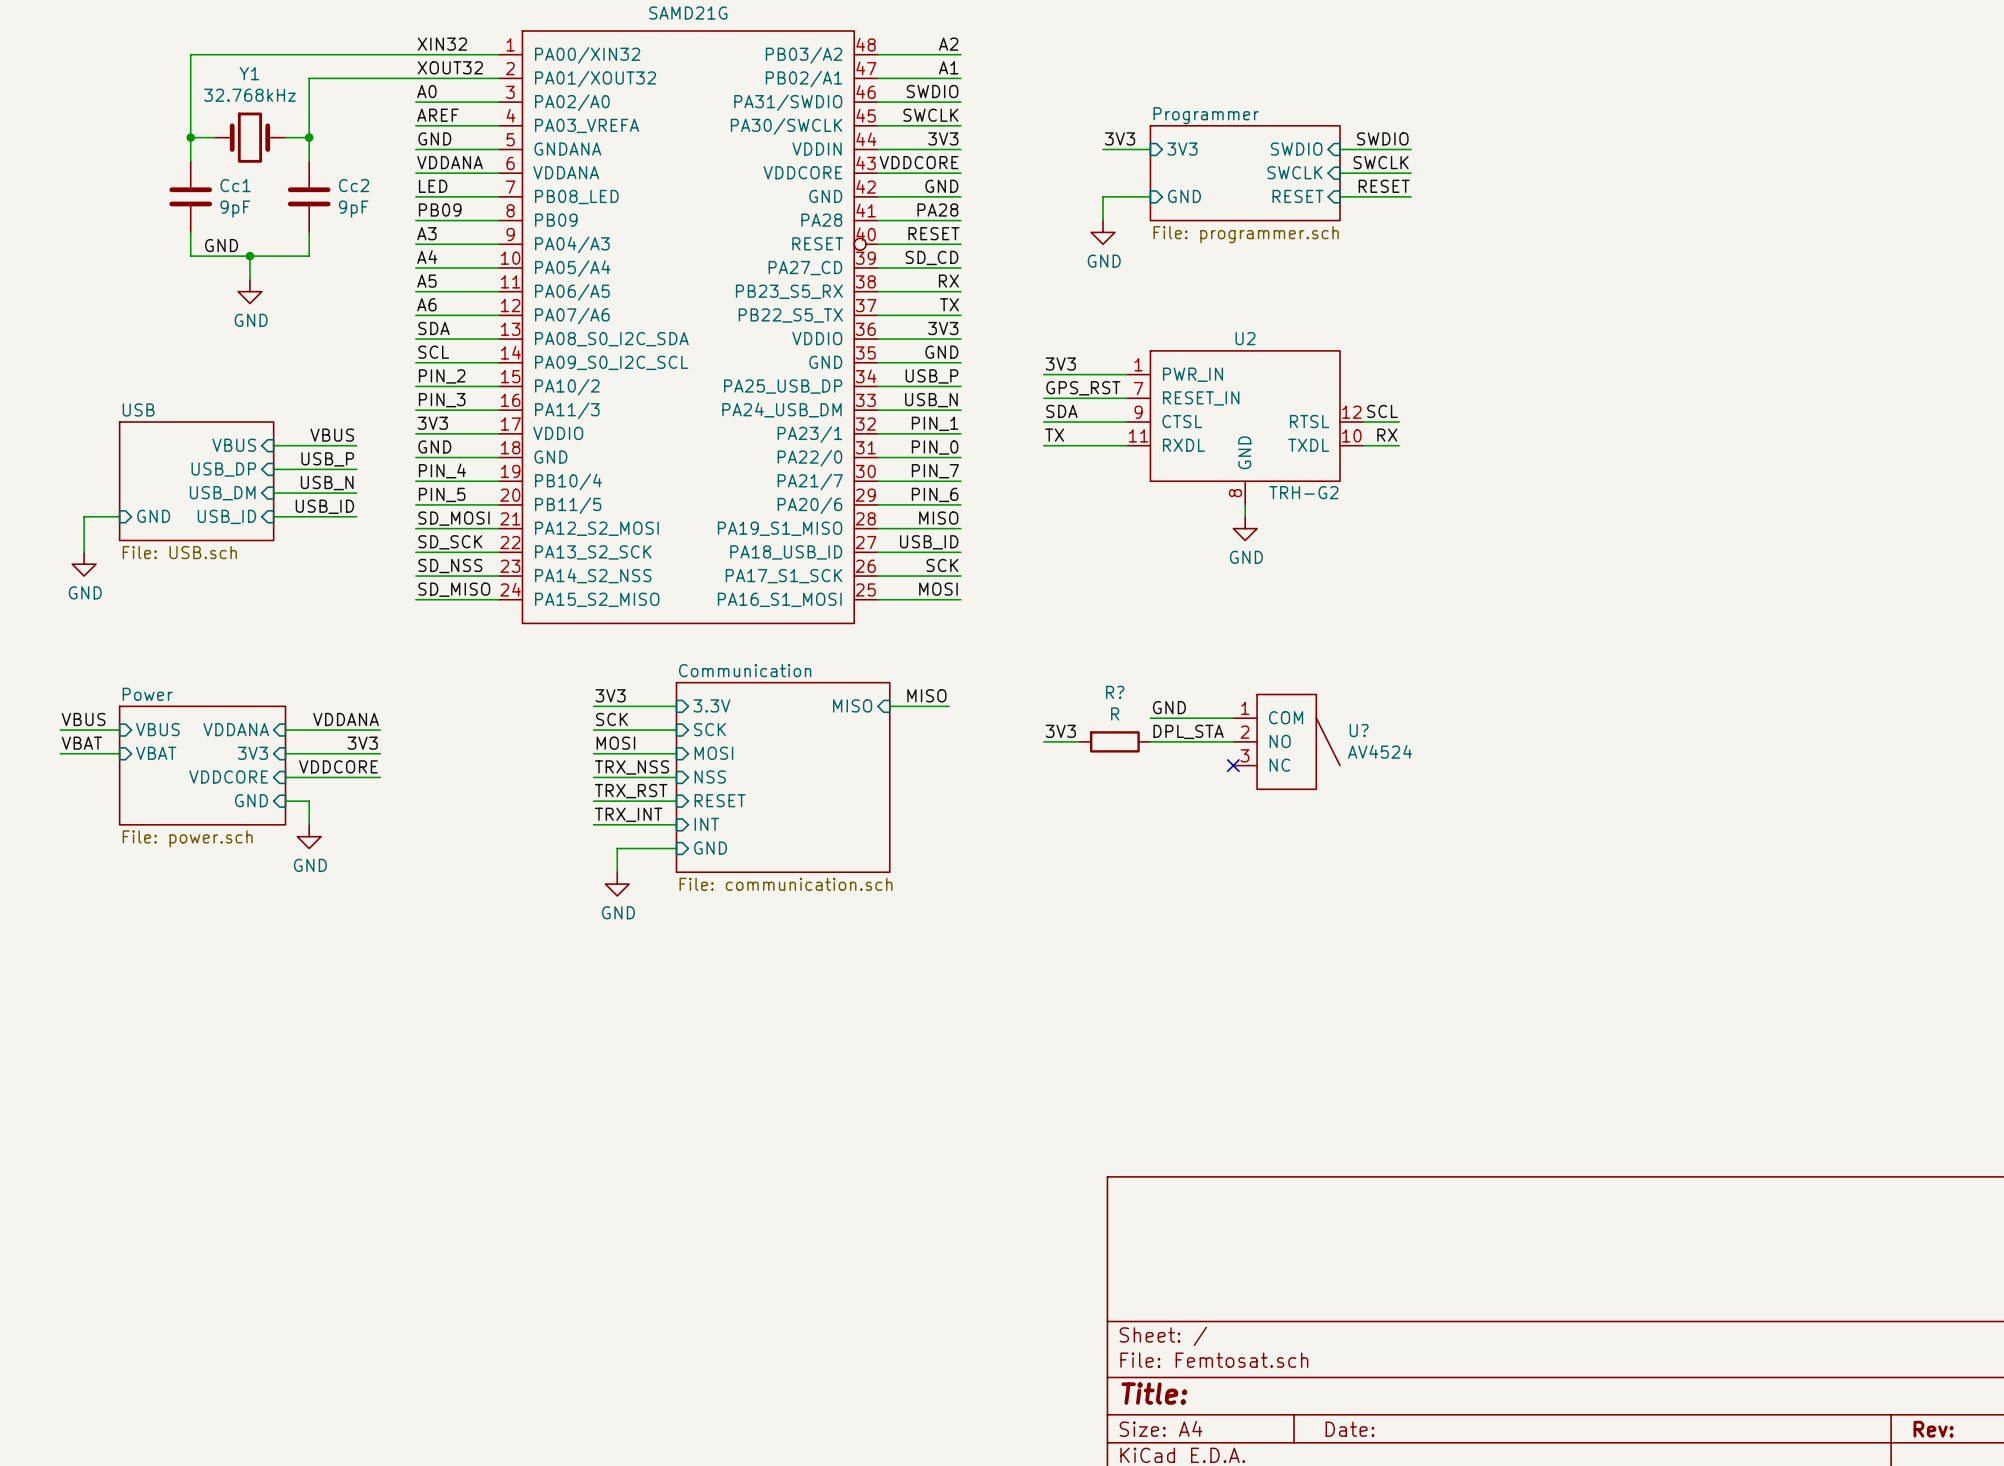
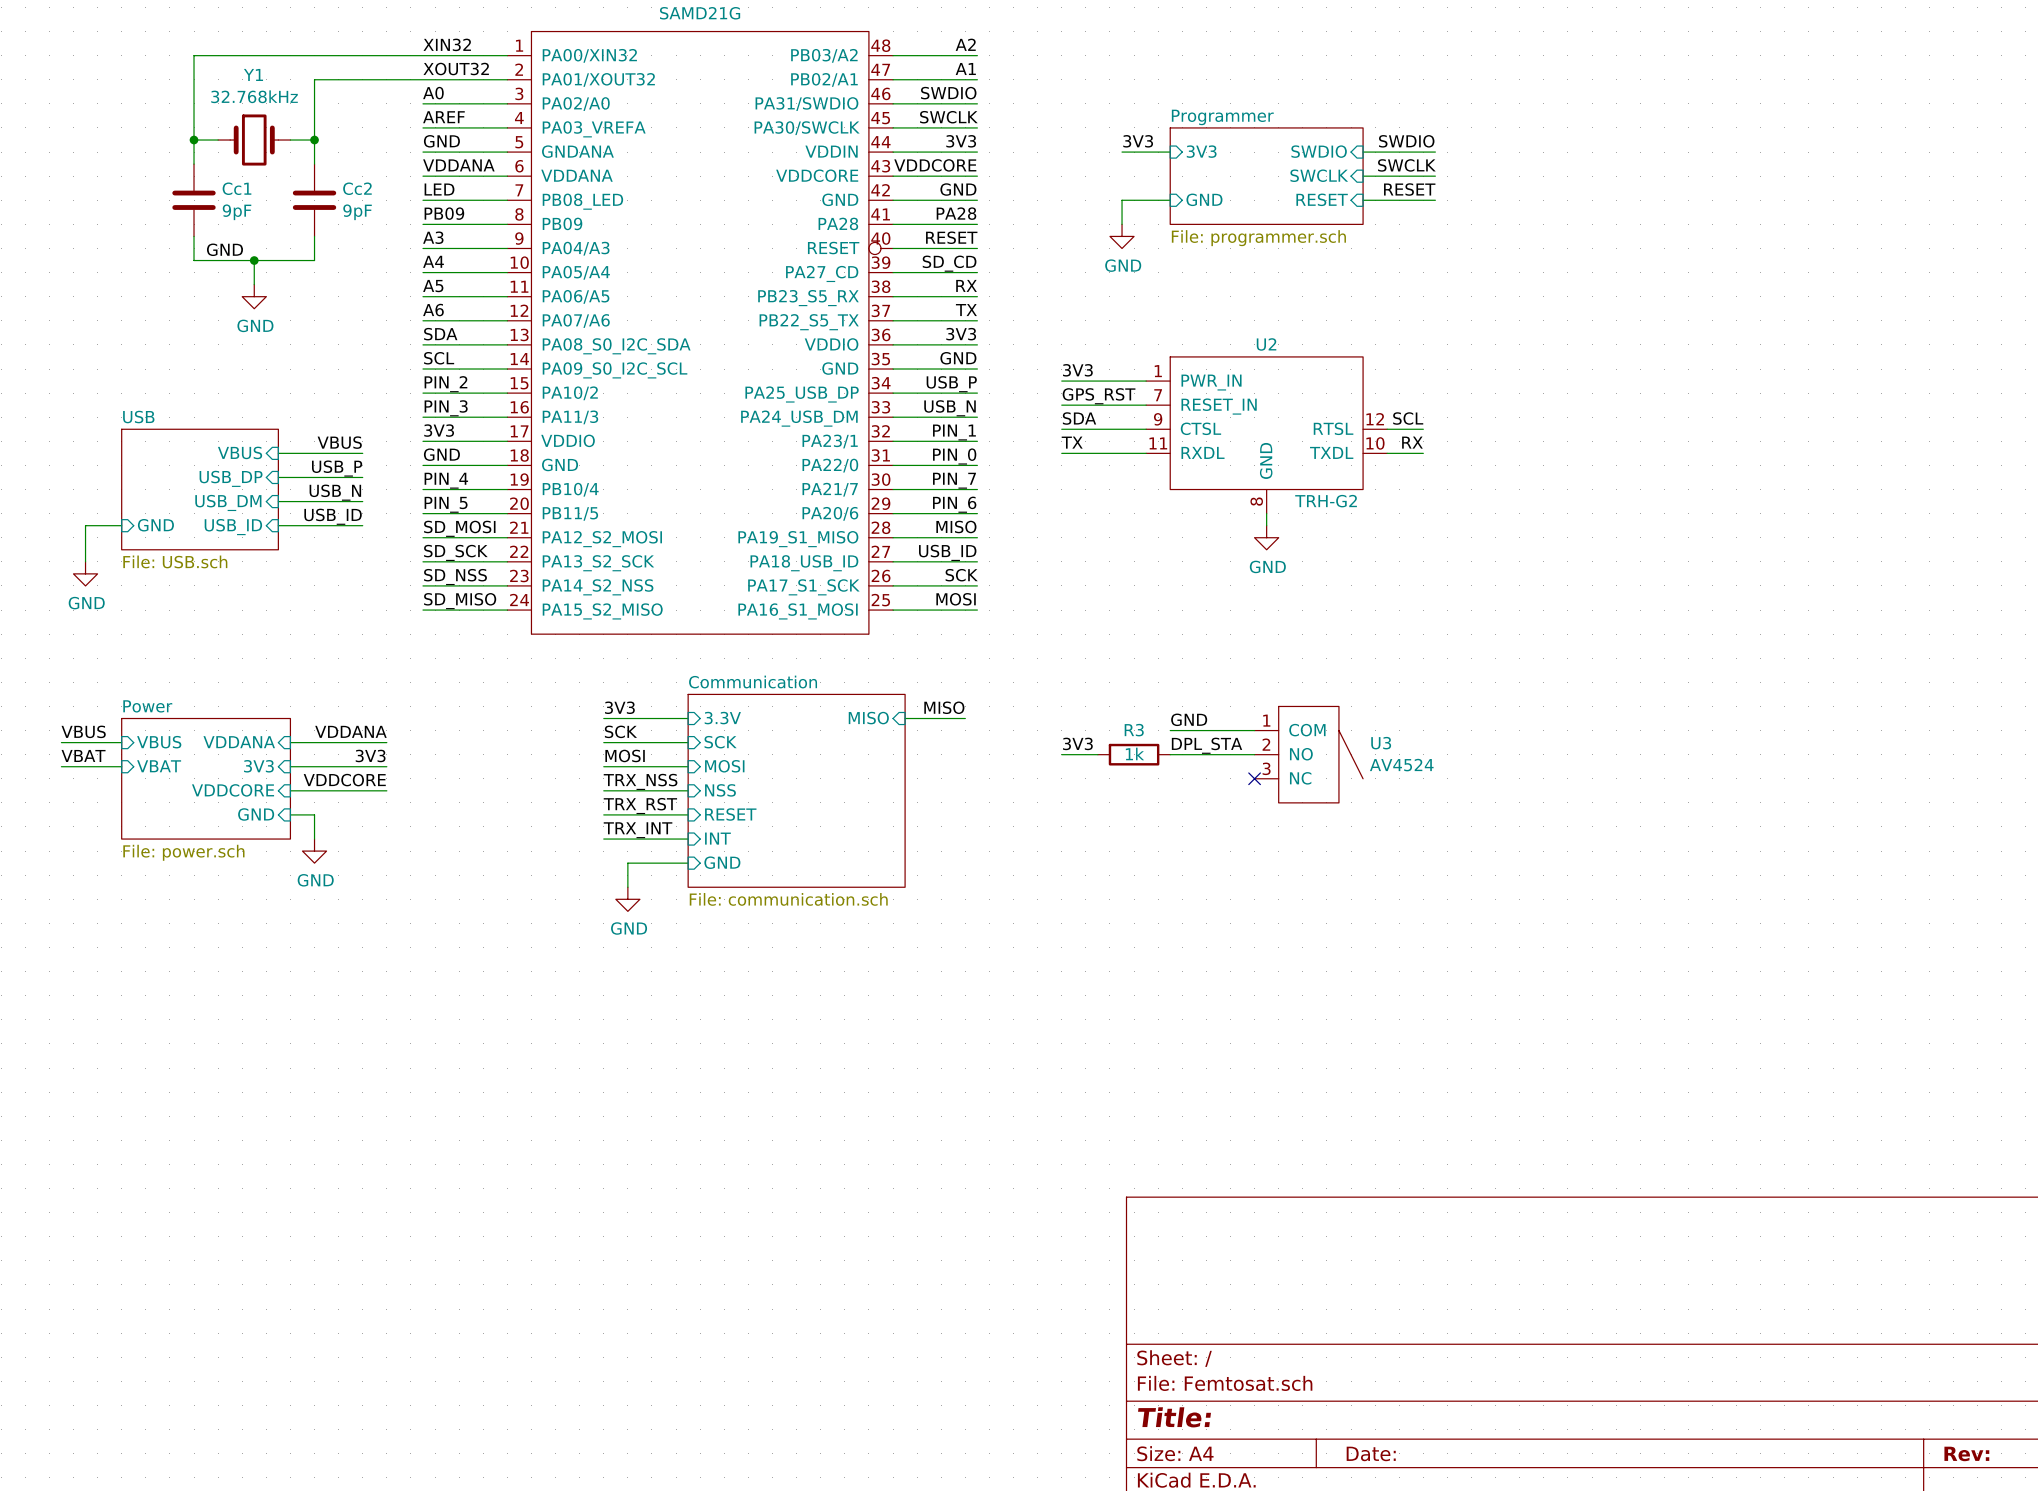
R? name: R? (1115, 692) -> R3 (1134, 730)
R? value: R (1115, 713) -> 1k (1134, 753)
U? name: U? (1359, 730) -> U3 (1381, 743)

